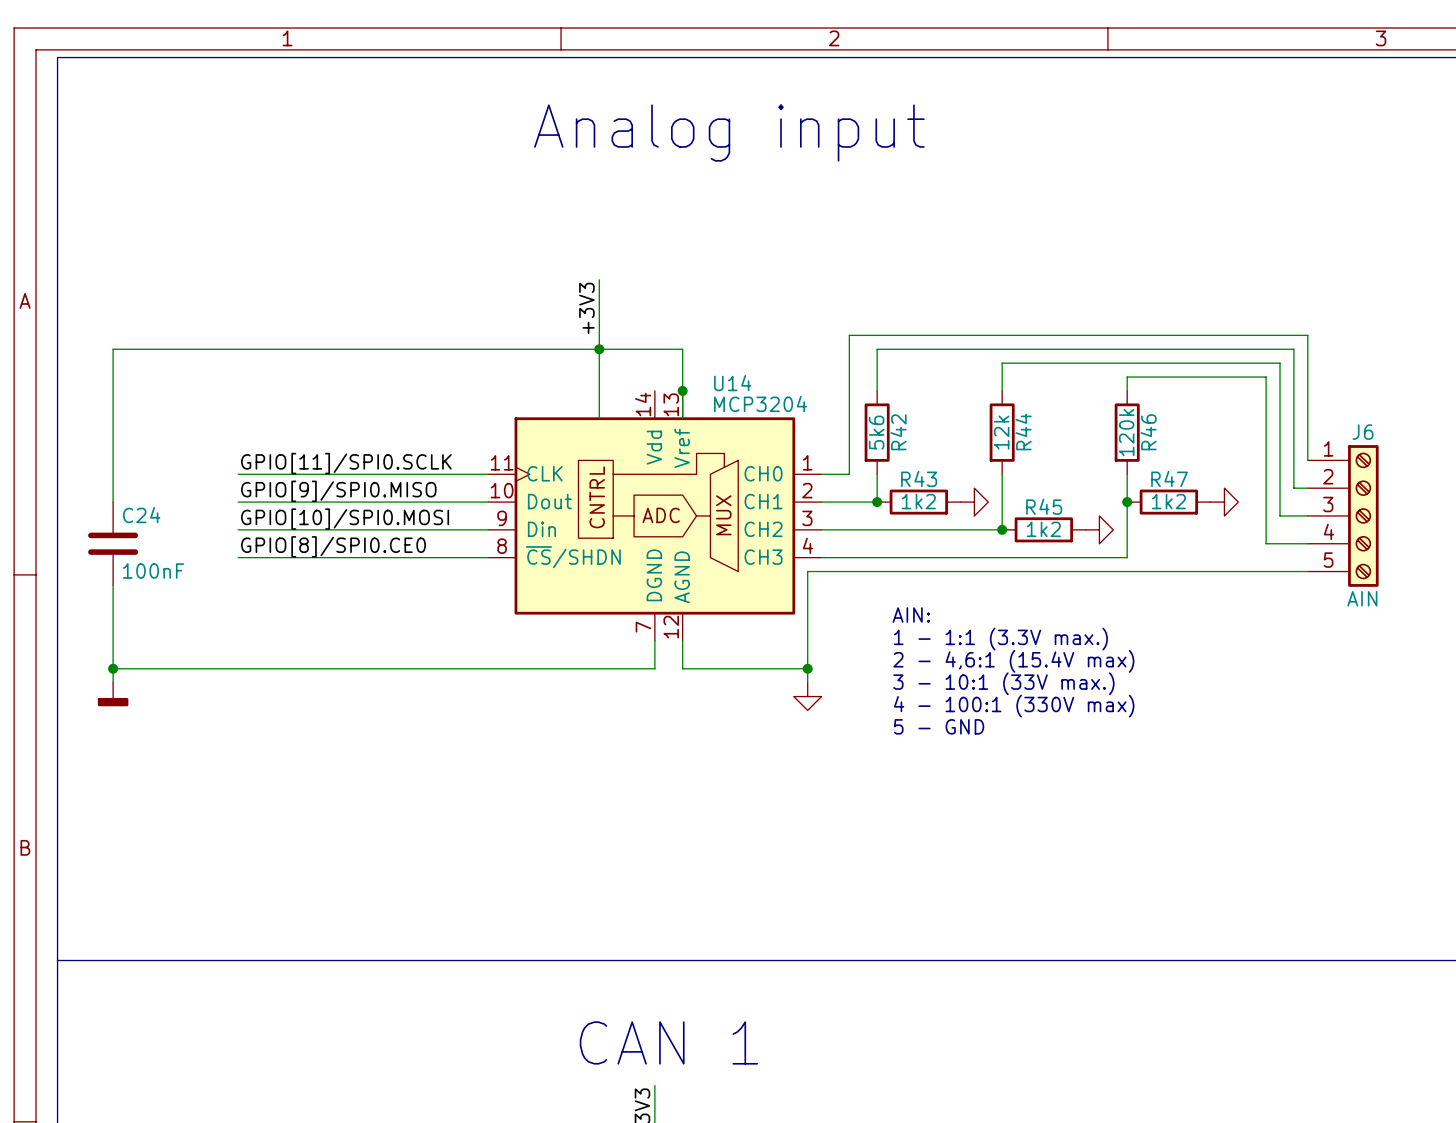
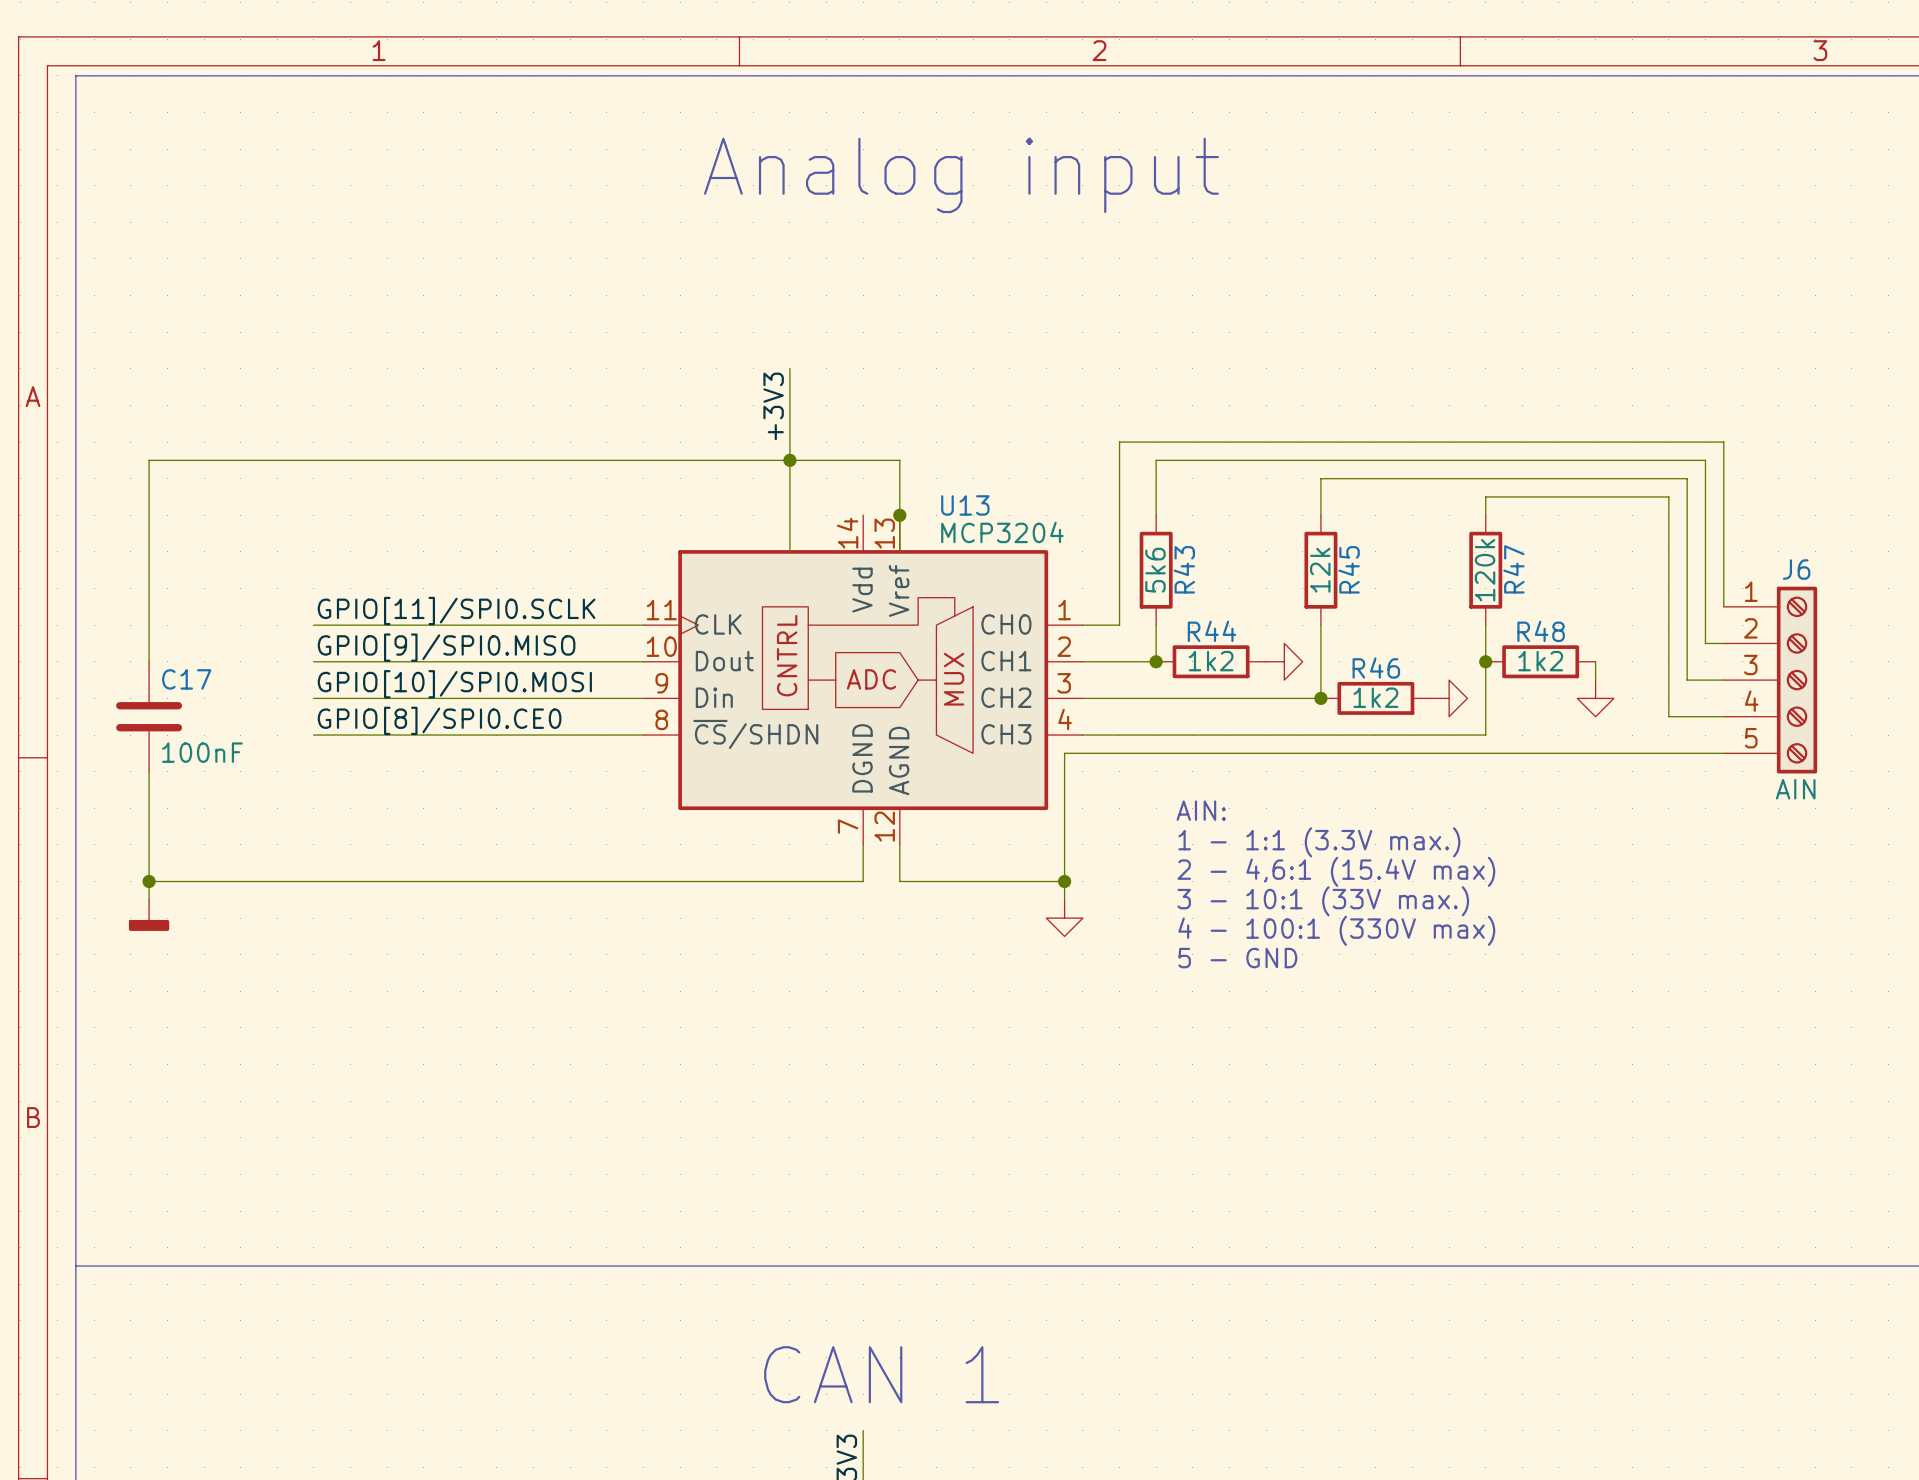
U14 name: U14 (732, 383) -> U13 (965, 505)
R44 name: R44 (1023, 431) -> R45 (1349, 569)
R42 name: R42 (898, 432) -> R43 (1184, 569)
R46 name: R46 (1148, 432) -> R47 (1513, 569)
R43 name: R43 (919, 479) -> R44 (1211, 631)
R47 name: R47 (1169, 479) -> R48 (1541, 631)
wire: none -> (1595, 661) (1595, 680)
power symbol rotation: 0° (1224, 502) -> 90° clockwise (1595, 698)
power symbol position: (1224, 502) -> (1595, 698)
R45 name: R45 (1044, 506) -> R46 (1376, 667)
C24 name: C24 (141, 515) -> C17 (186, 679)

